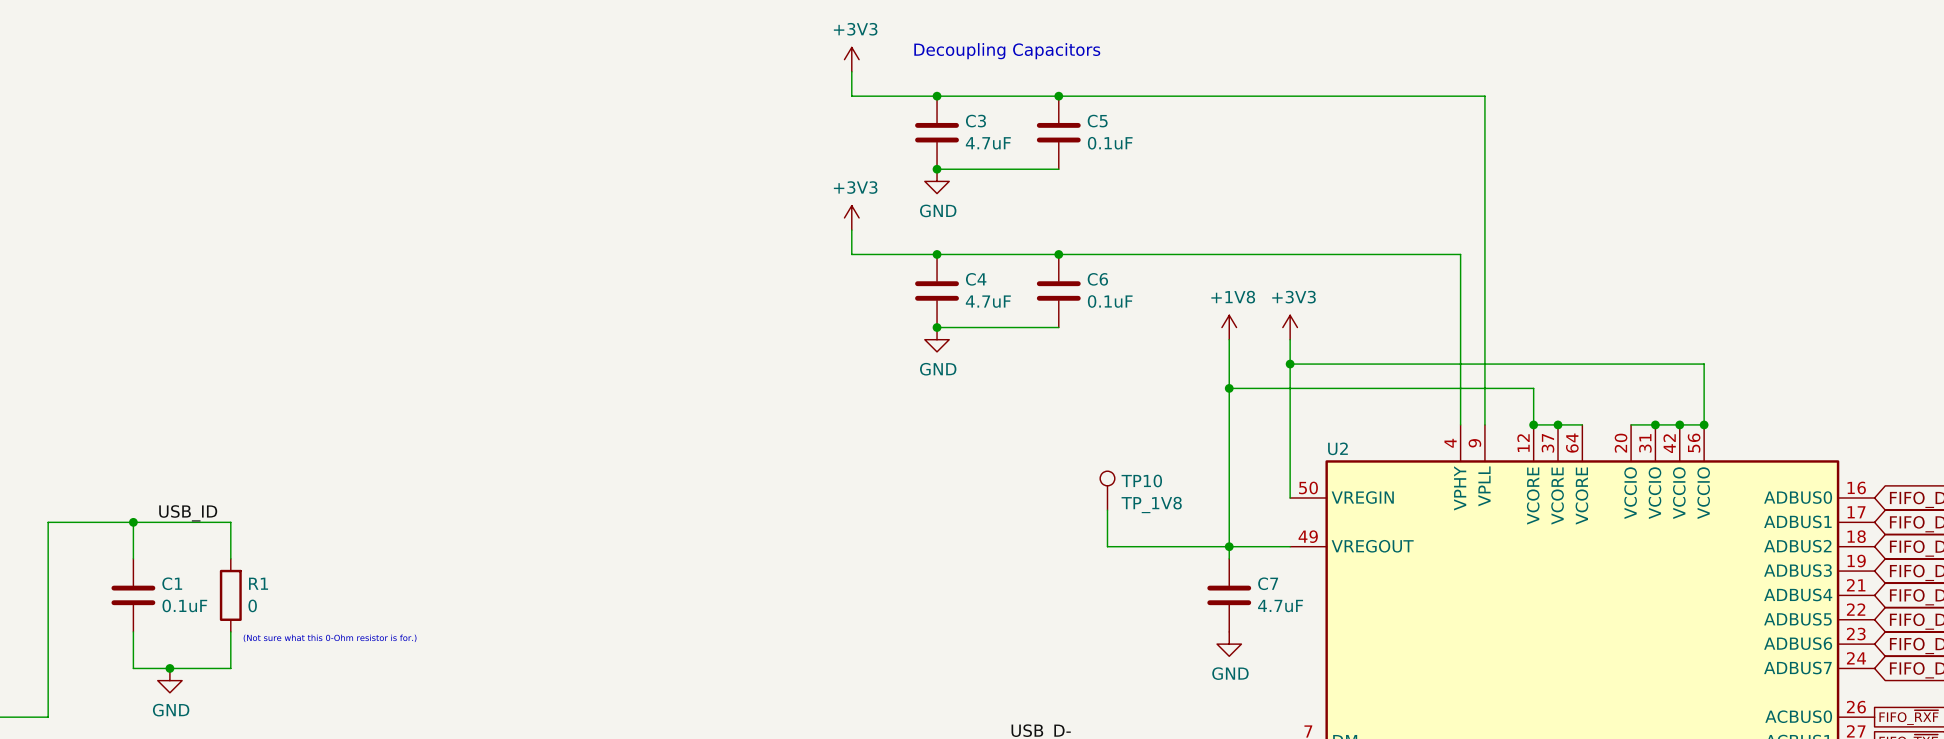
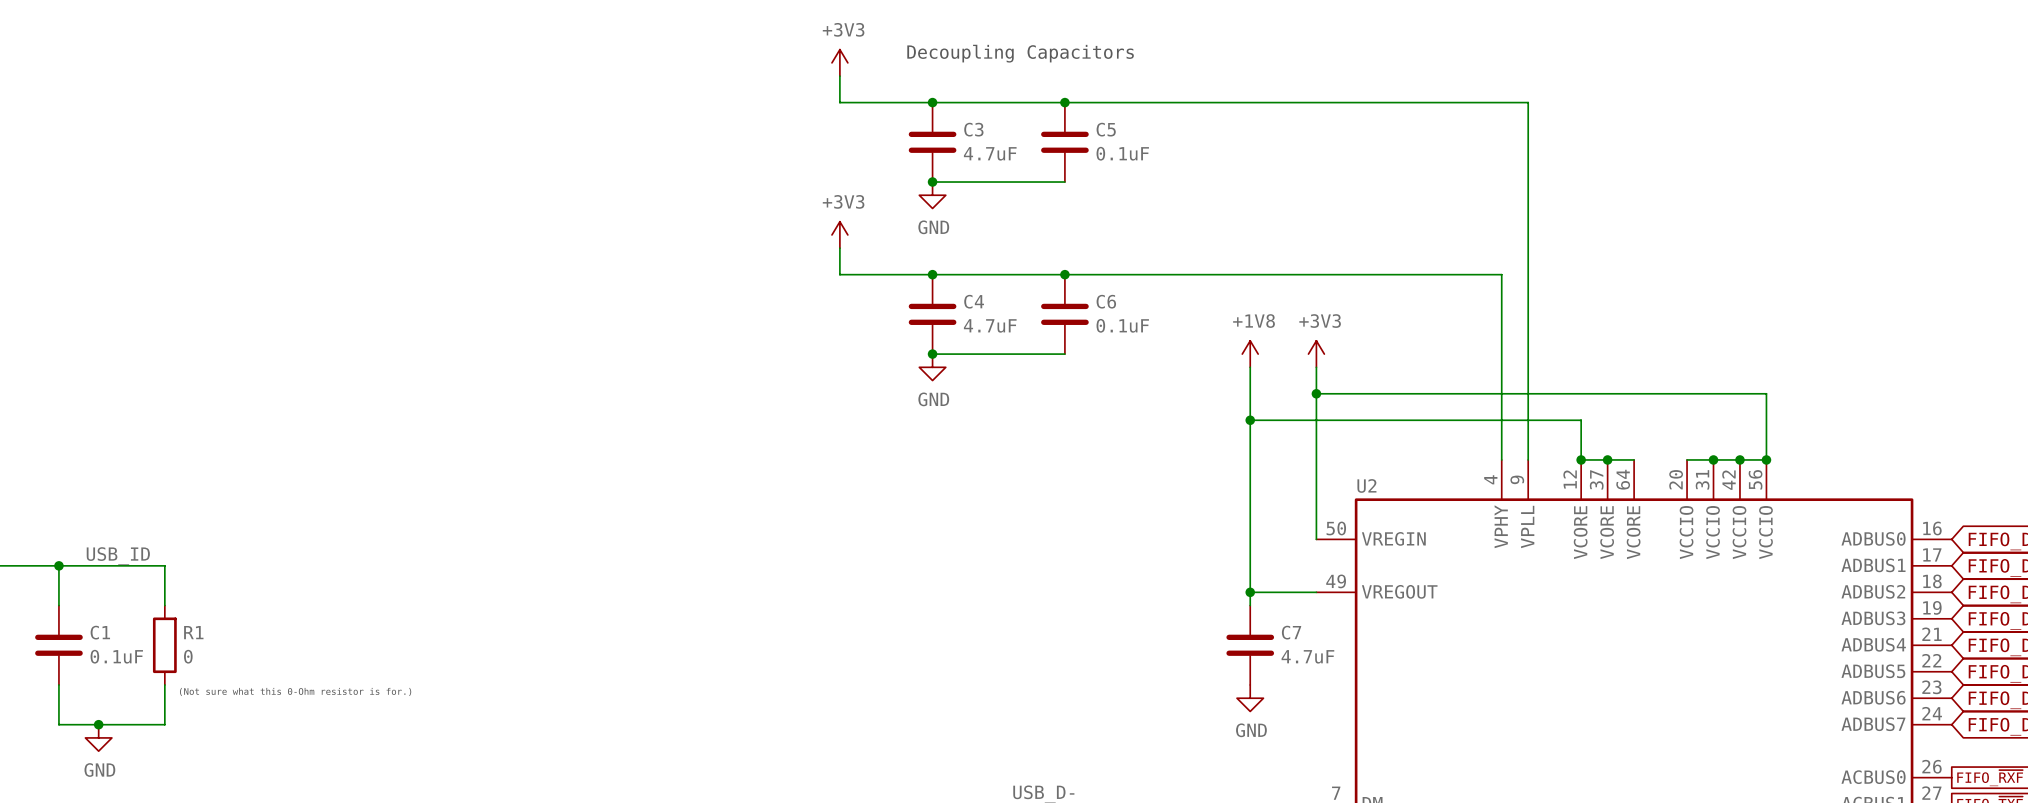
TP10: TP_1V8 (1107, 490) -> none
wire: (1107, 510) (1107, 546) (1229, 546) -> none

